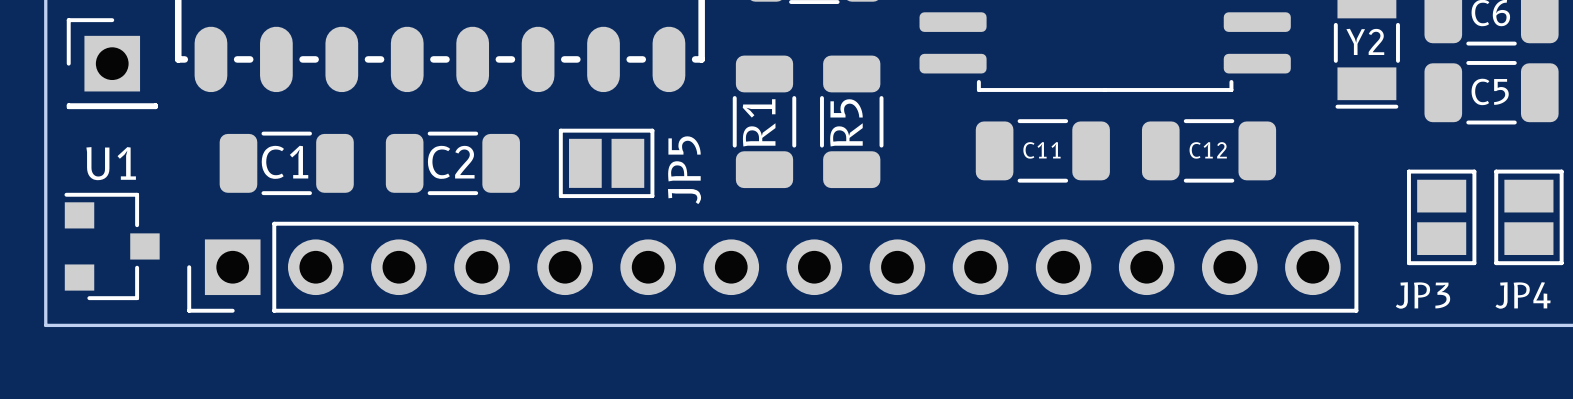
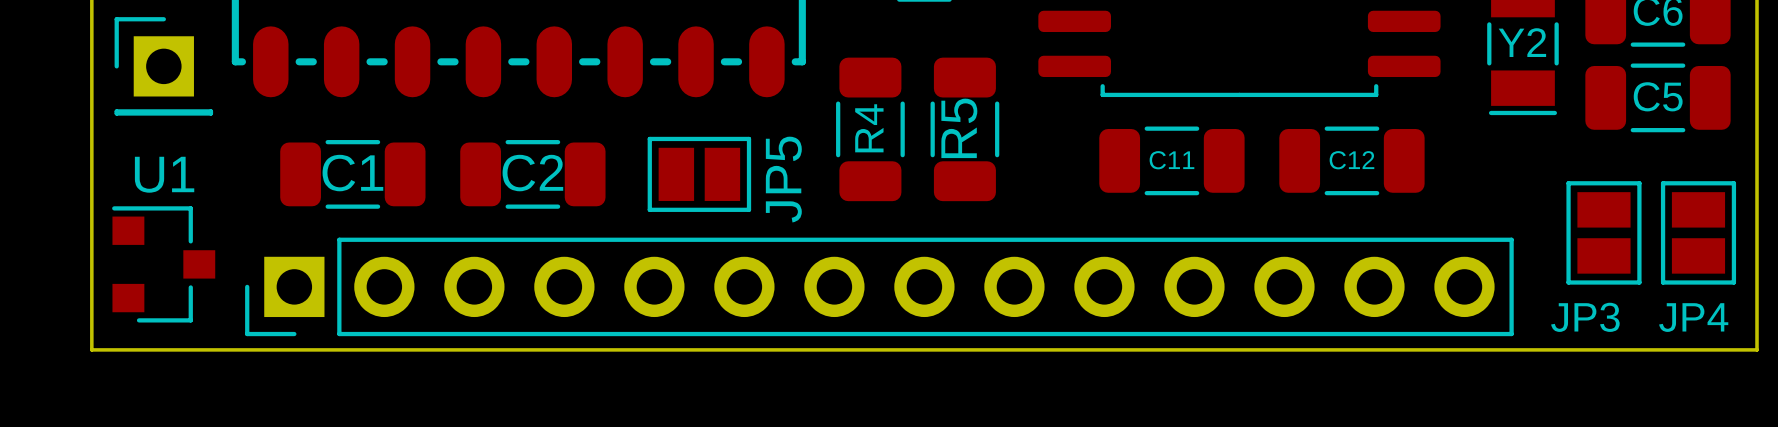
R1 name: R1 (759, 122) -> R4 (869, 128)

